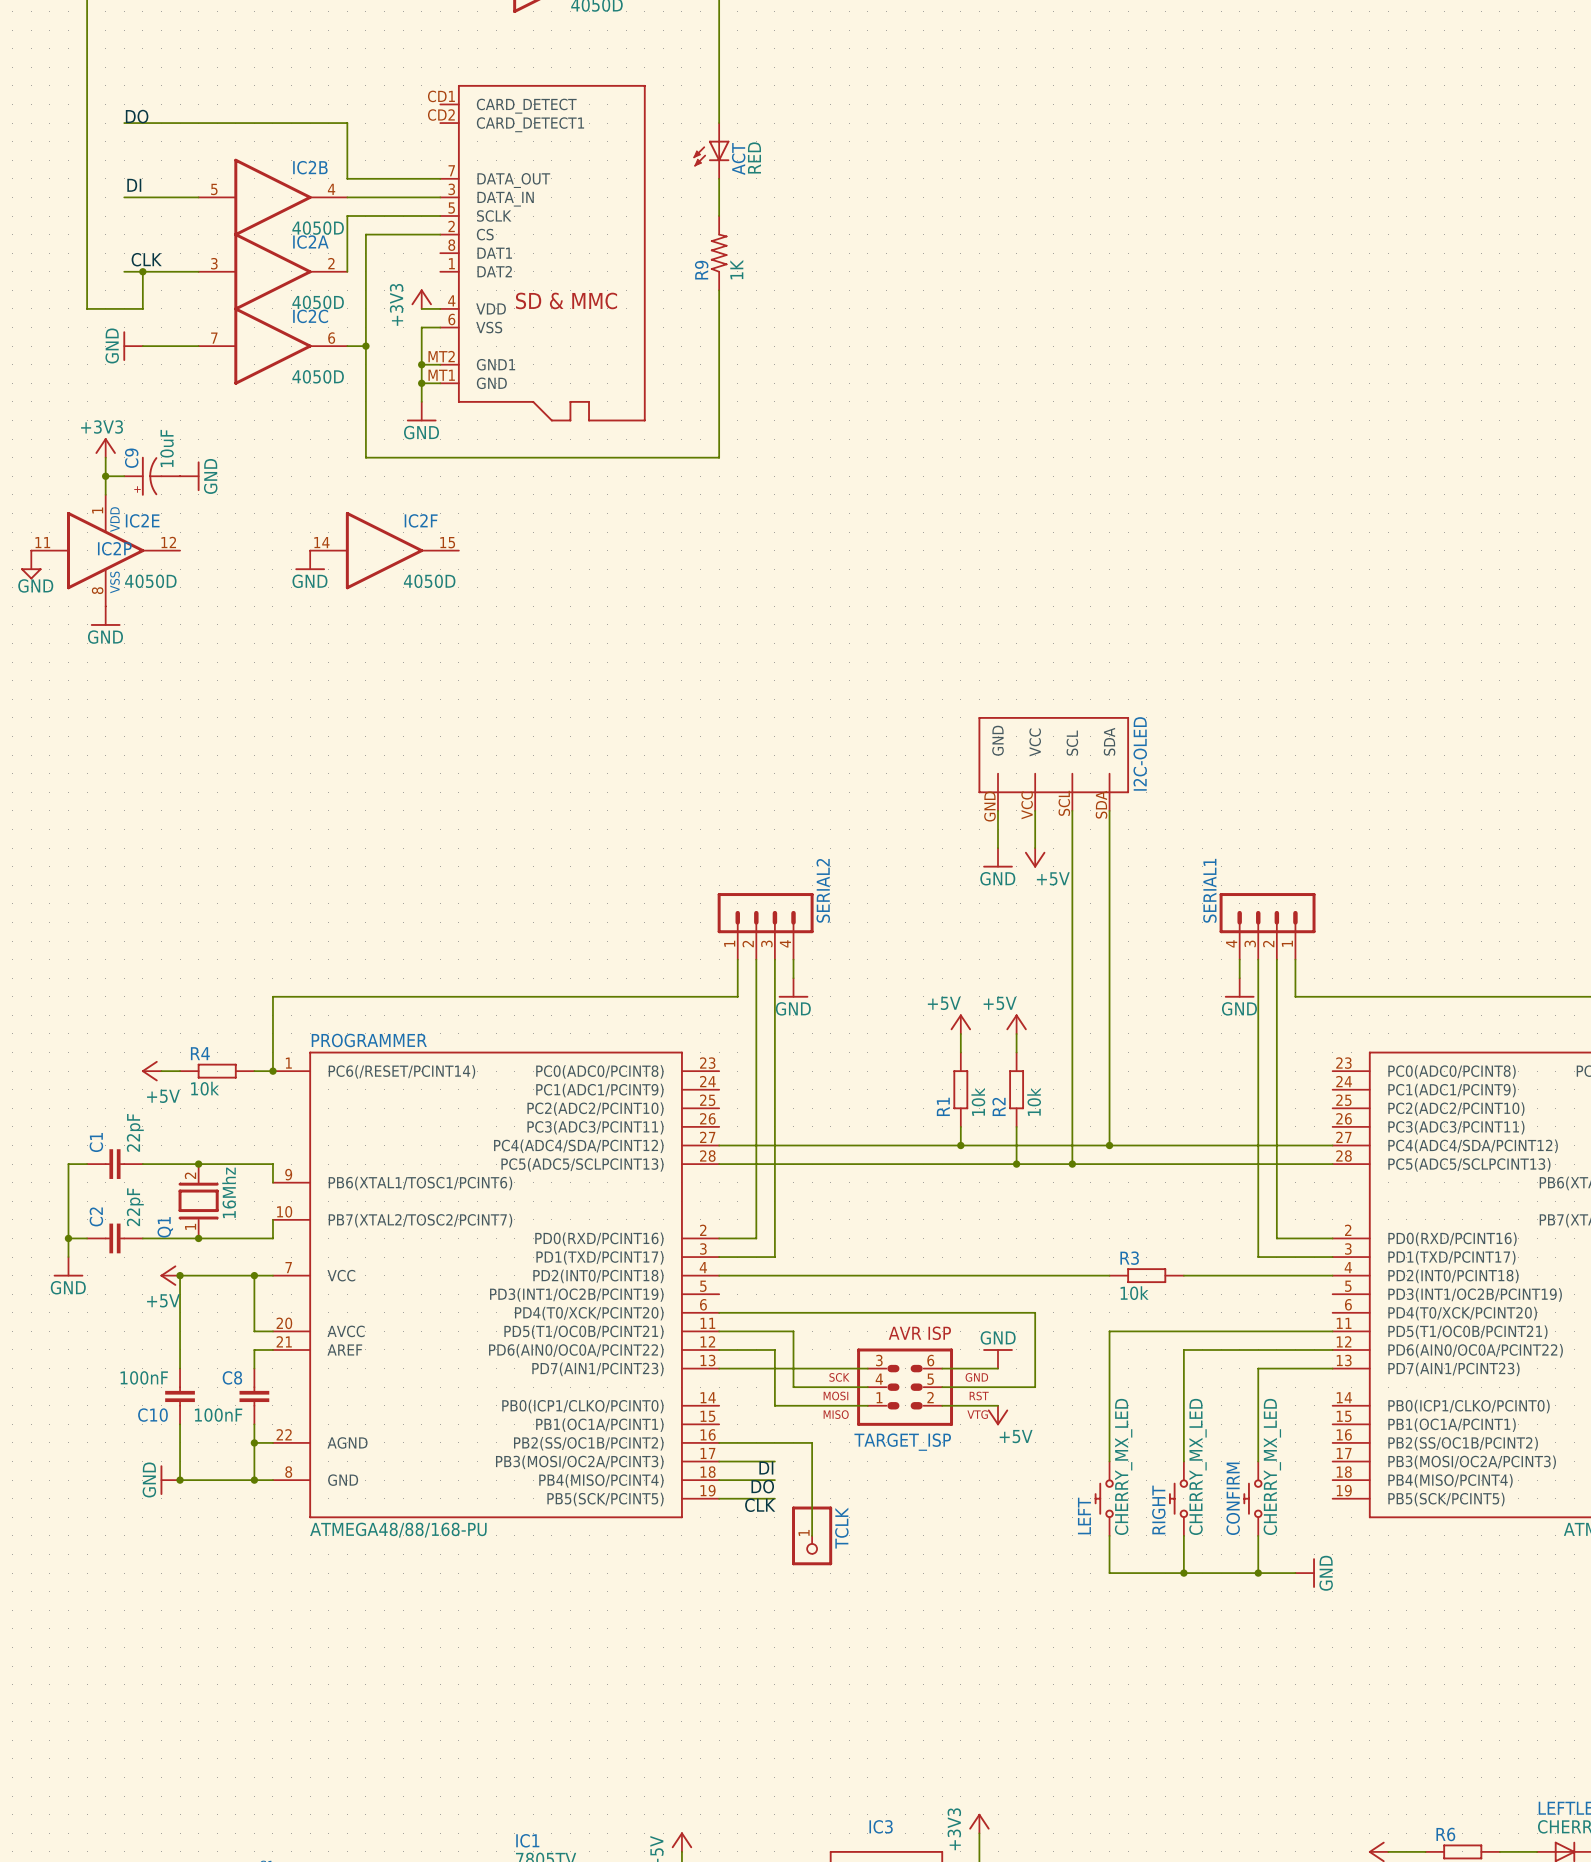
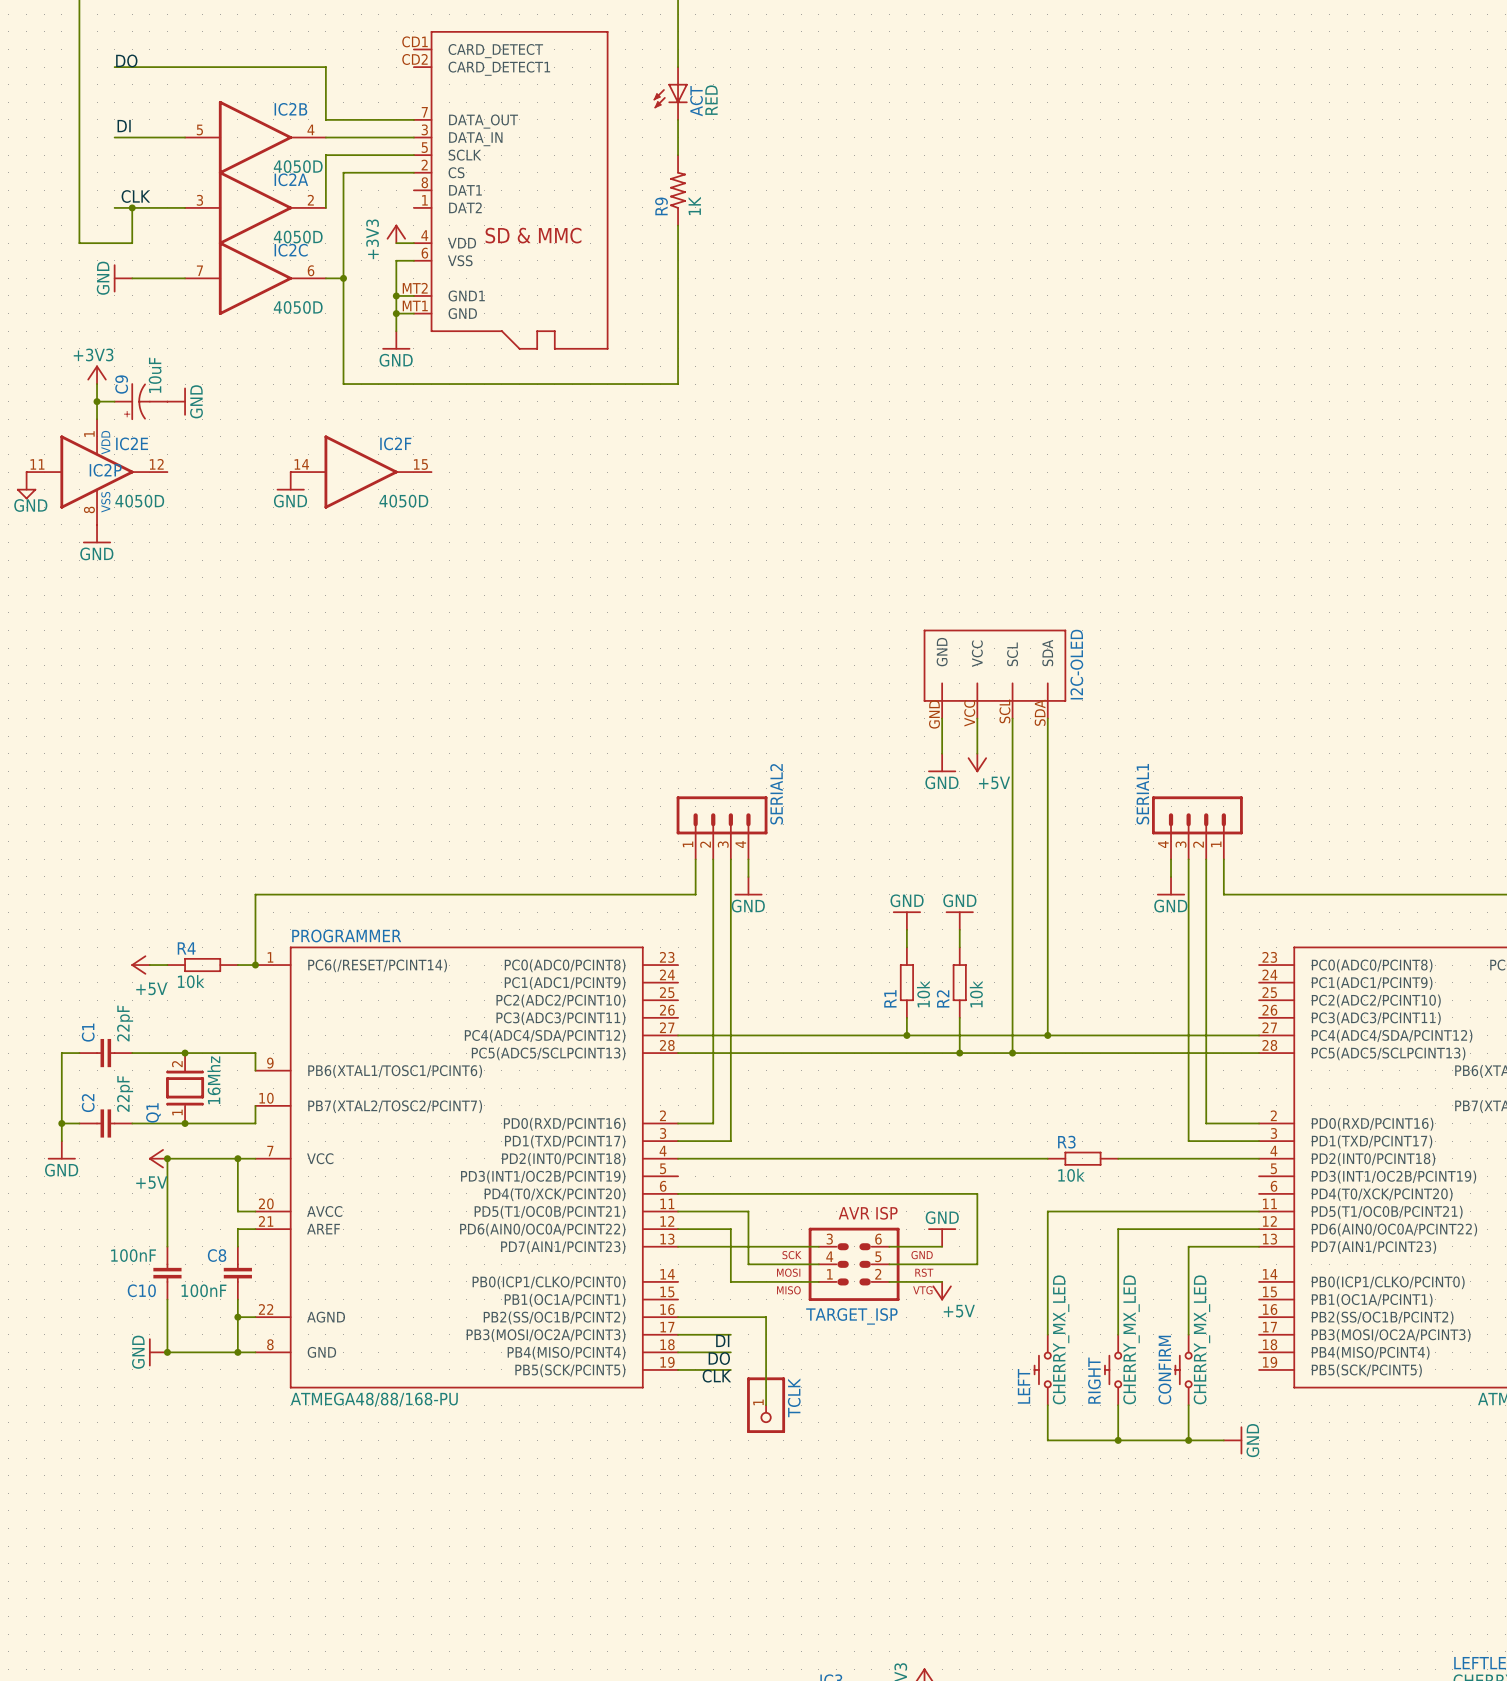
power symbol: +5V (960, 1024) -> GND (906, 920)
power symbol: +5V (1016, 1024) -> GND (959, 920)

